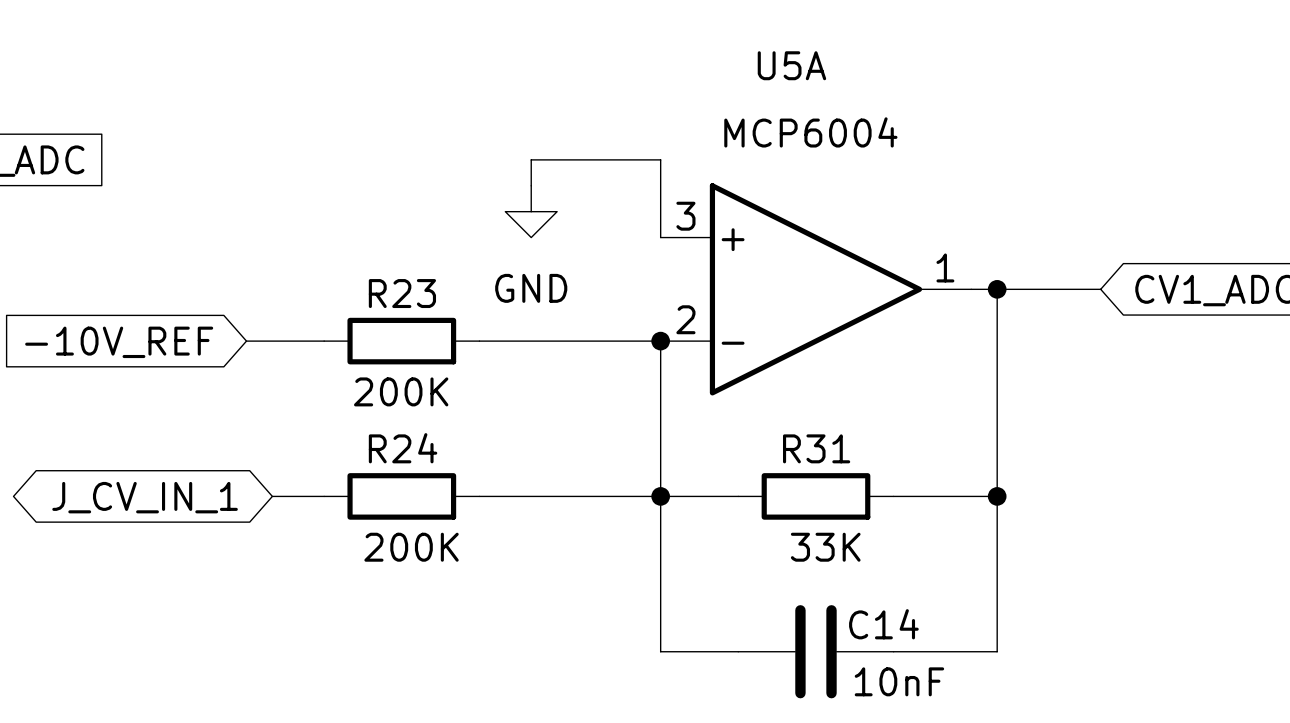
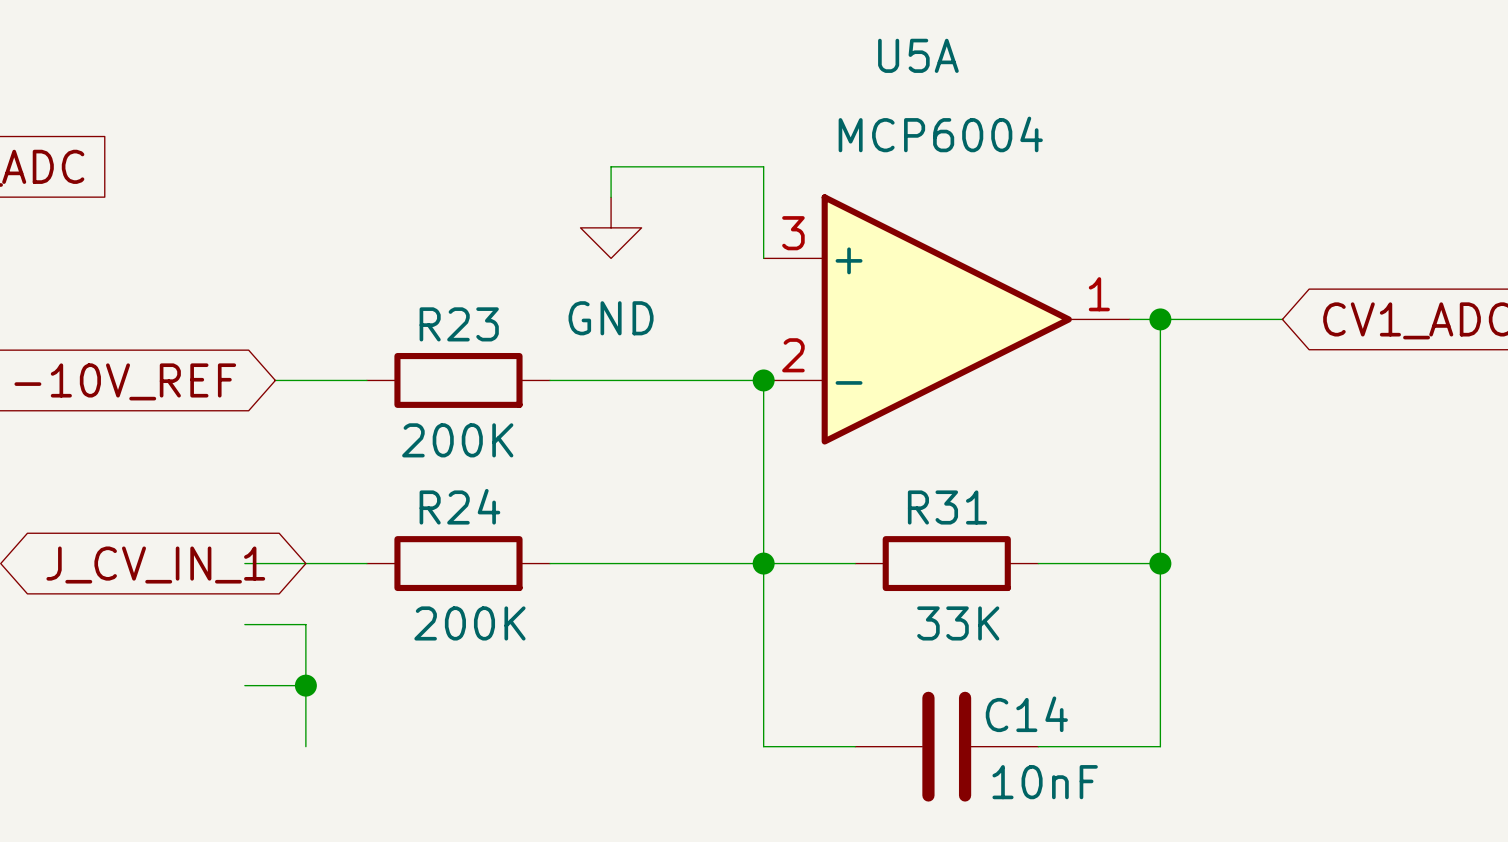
wire: none -> (244, 563) (305, 563)
wire: none -> (244, 624) (305, 624) (305, 746)
wire: none -> (244, 685) (305, 685)
junction: none -> (305, 685)

